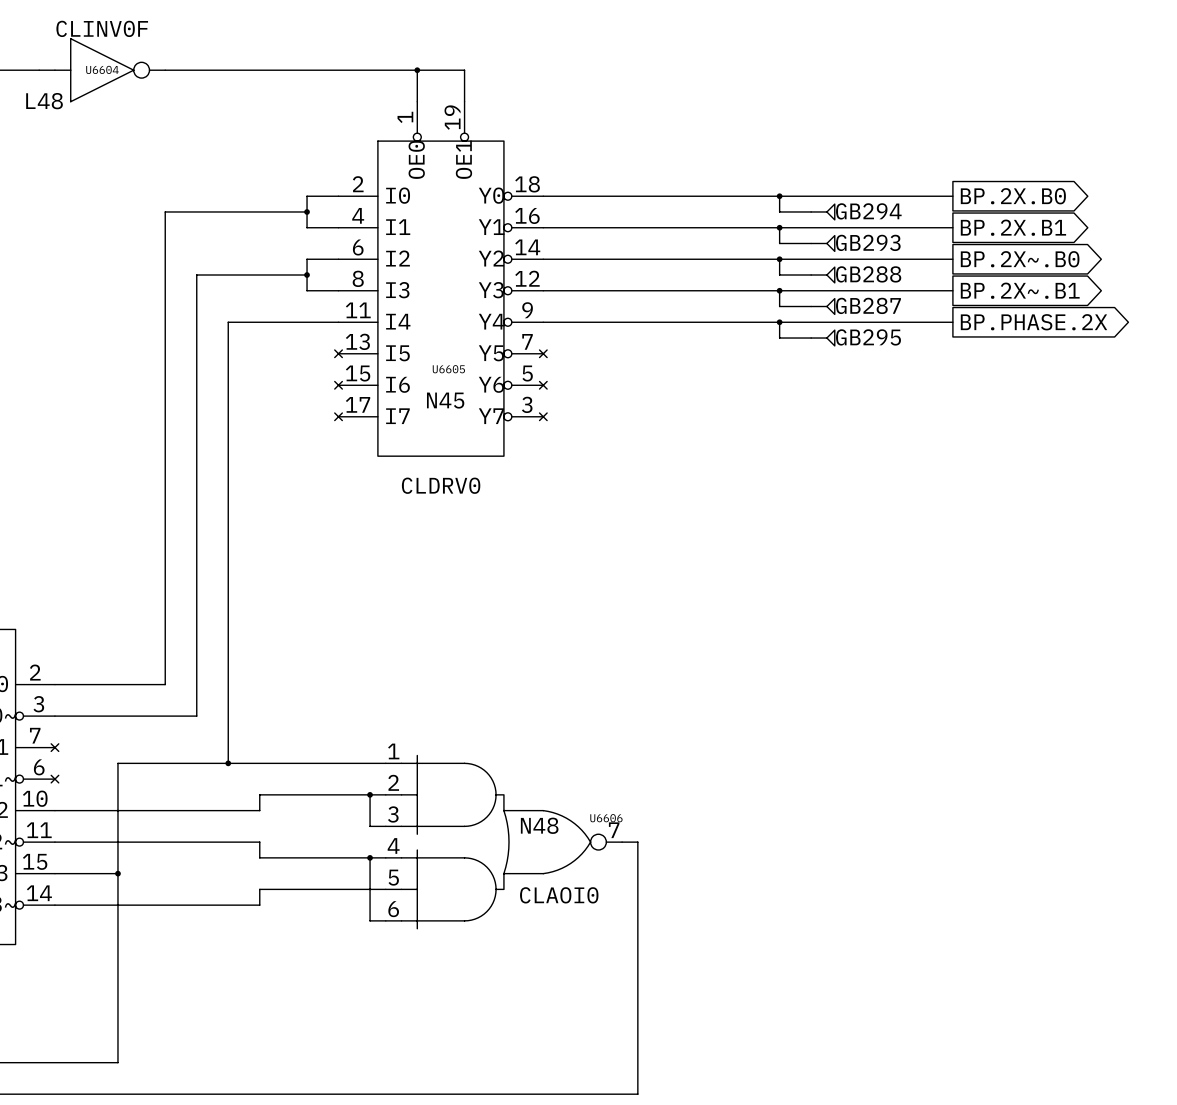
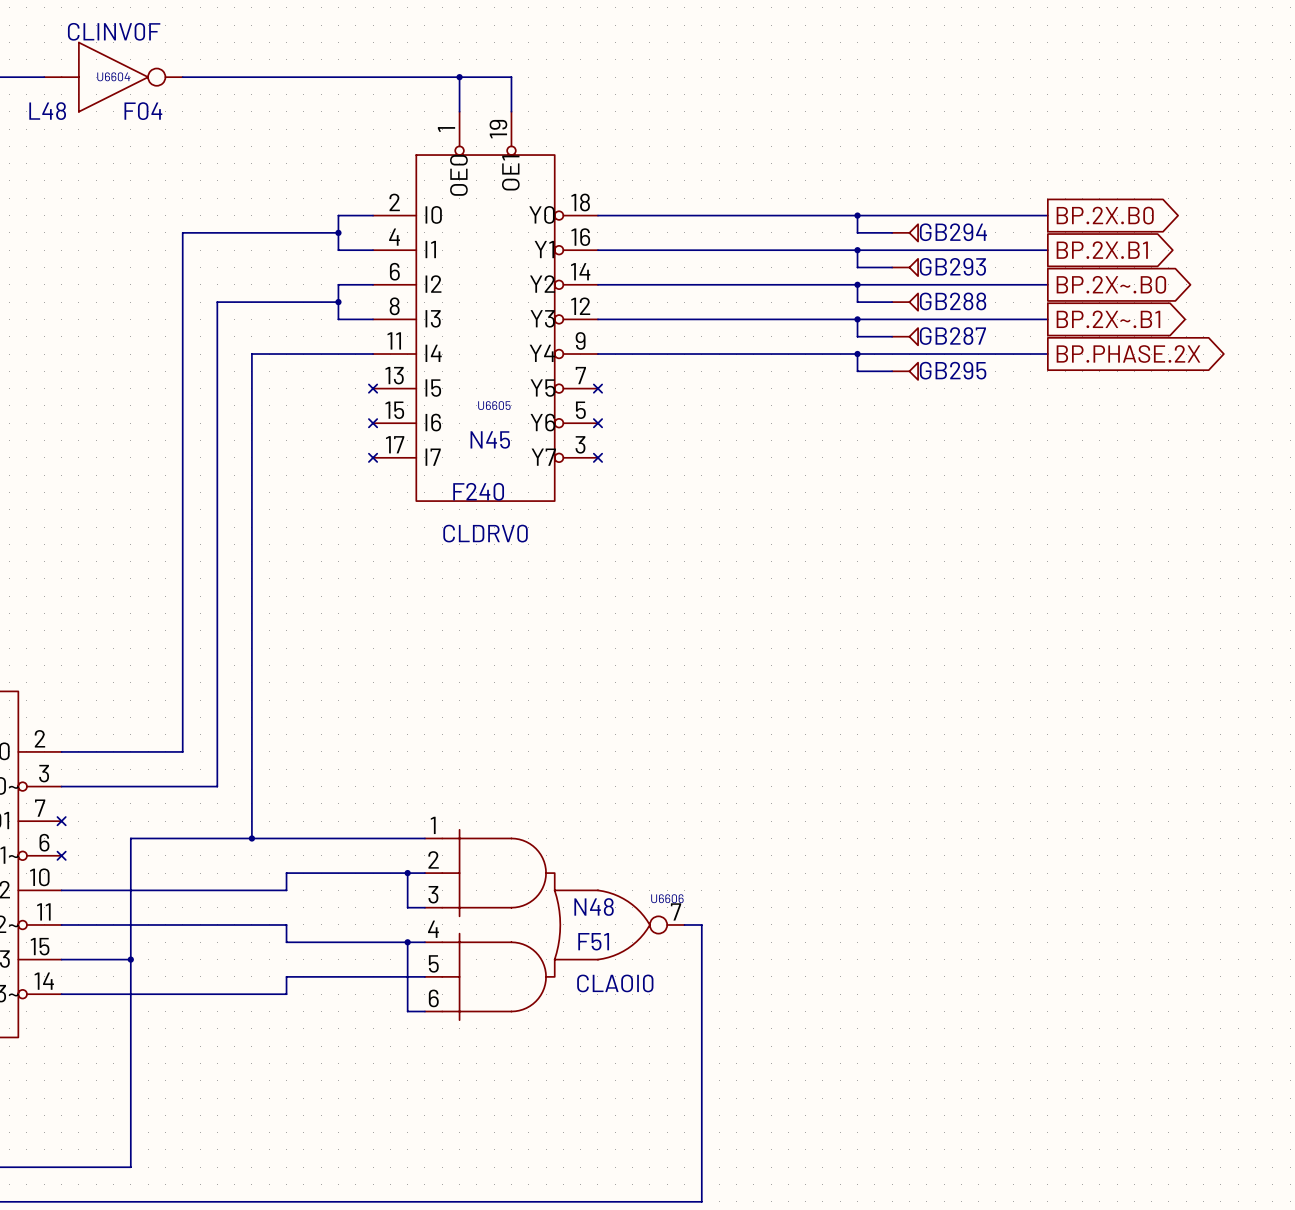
U6604 value: none -> F04 (143, 111)
U6605 value: none -> F240 (478, 491)
U6606 value: none -> F51 (593, 941)

